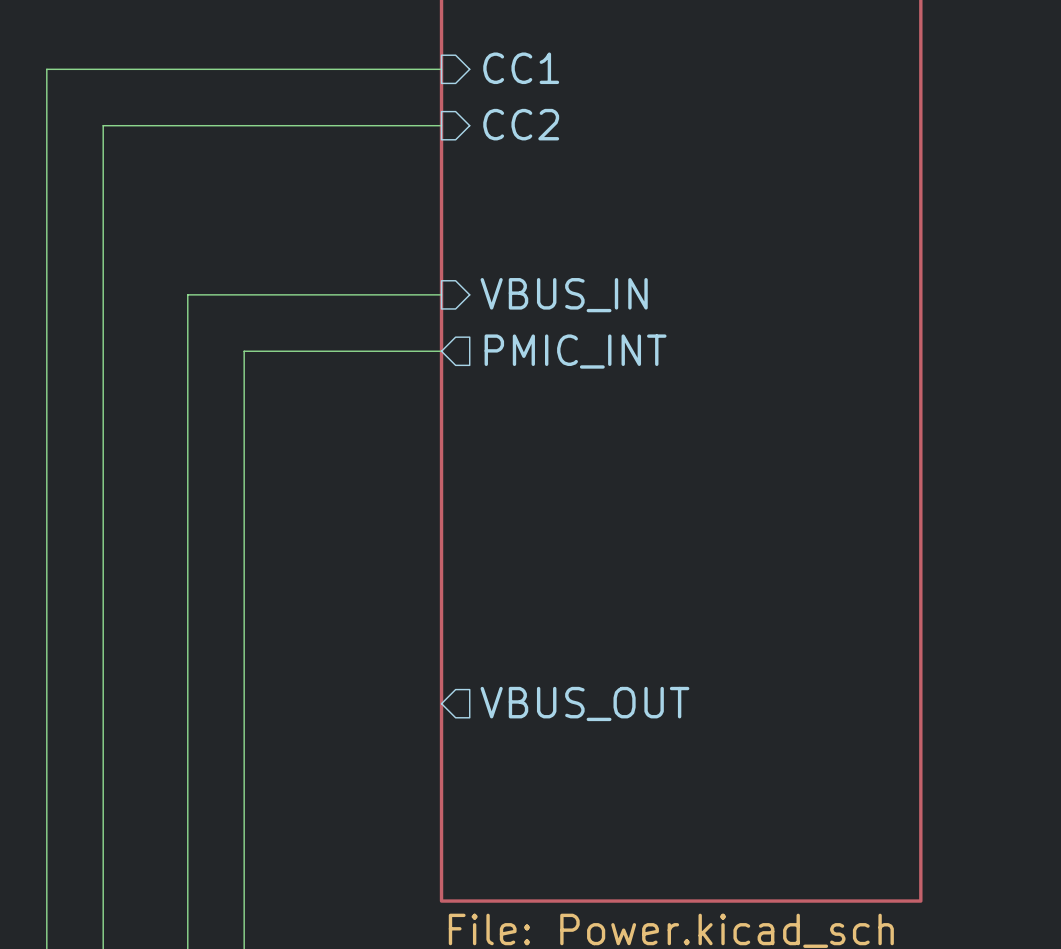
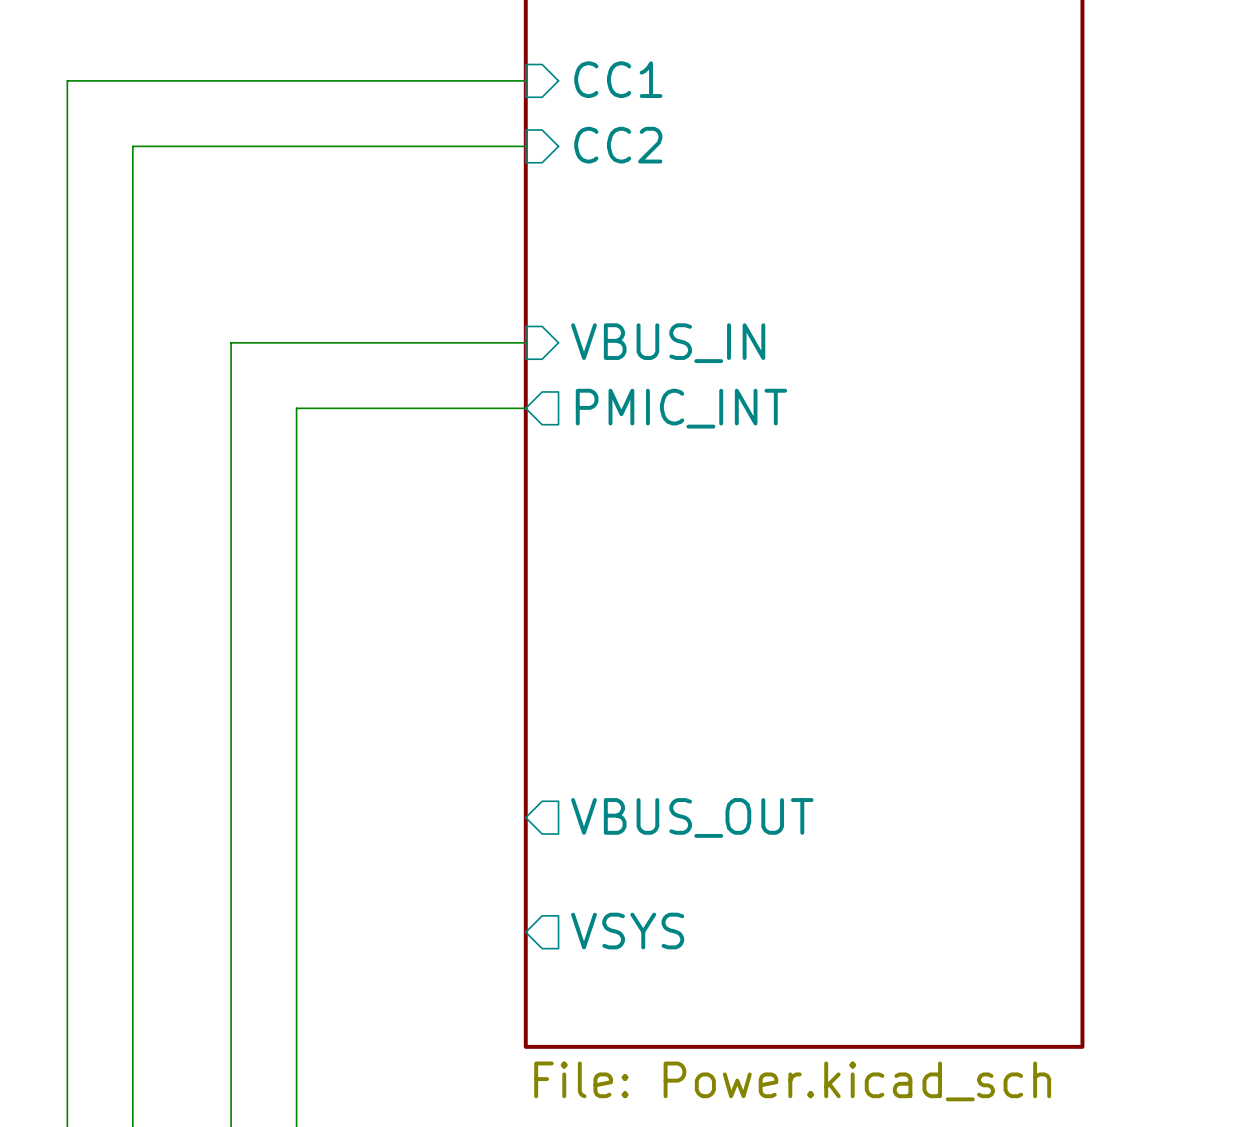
sheet pin: none -> VSYS (627, 931)

